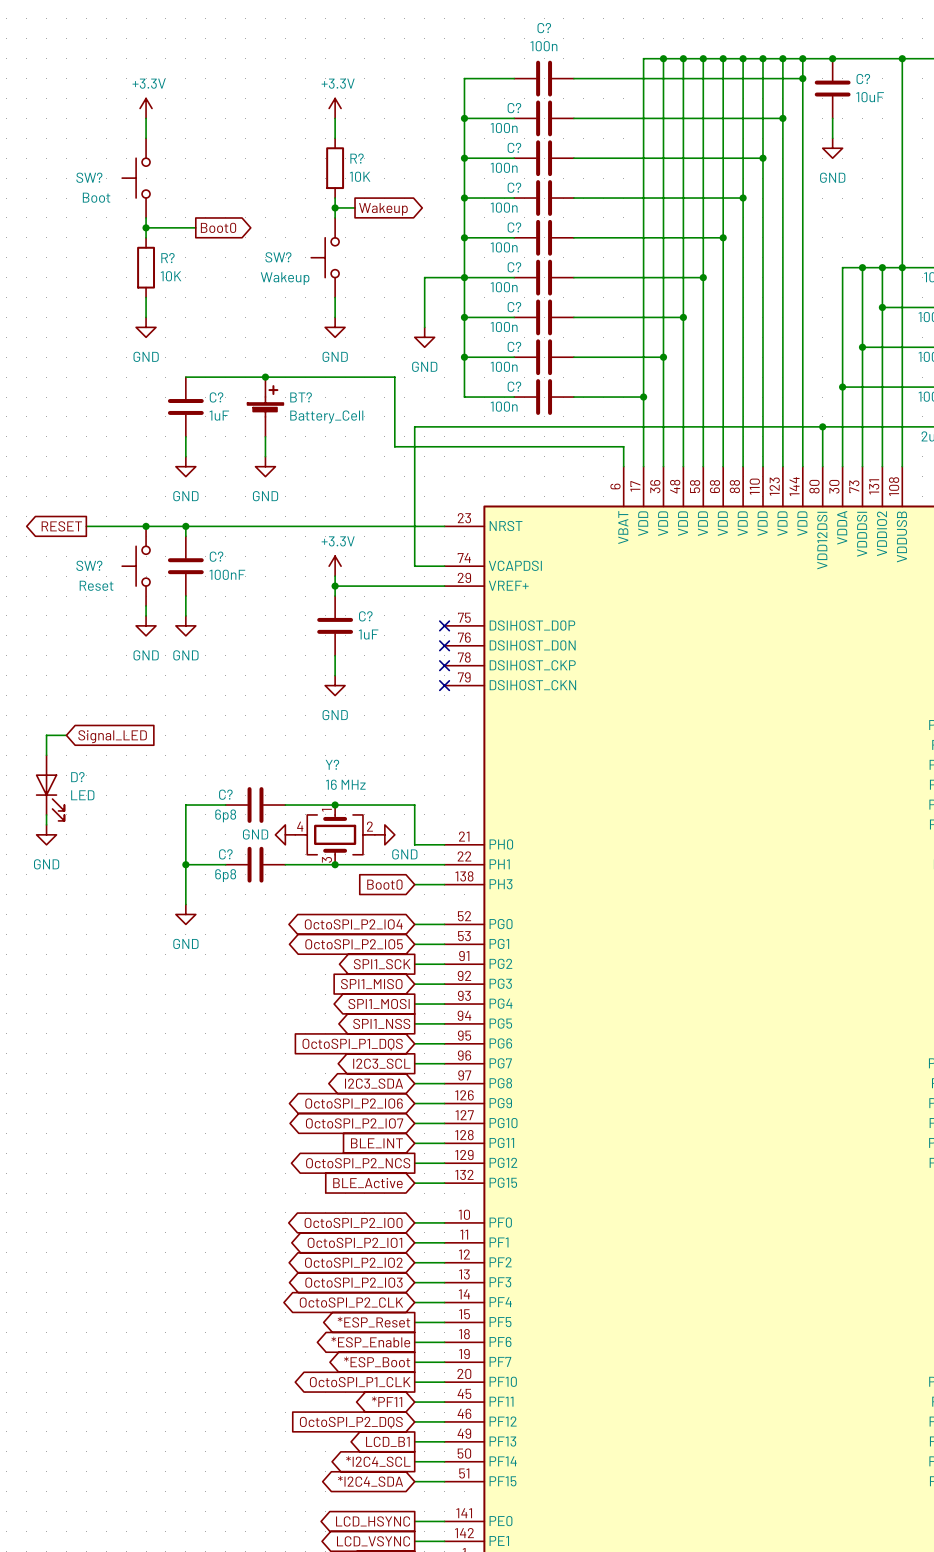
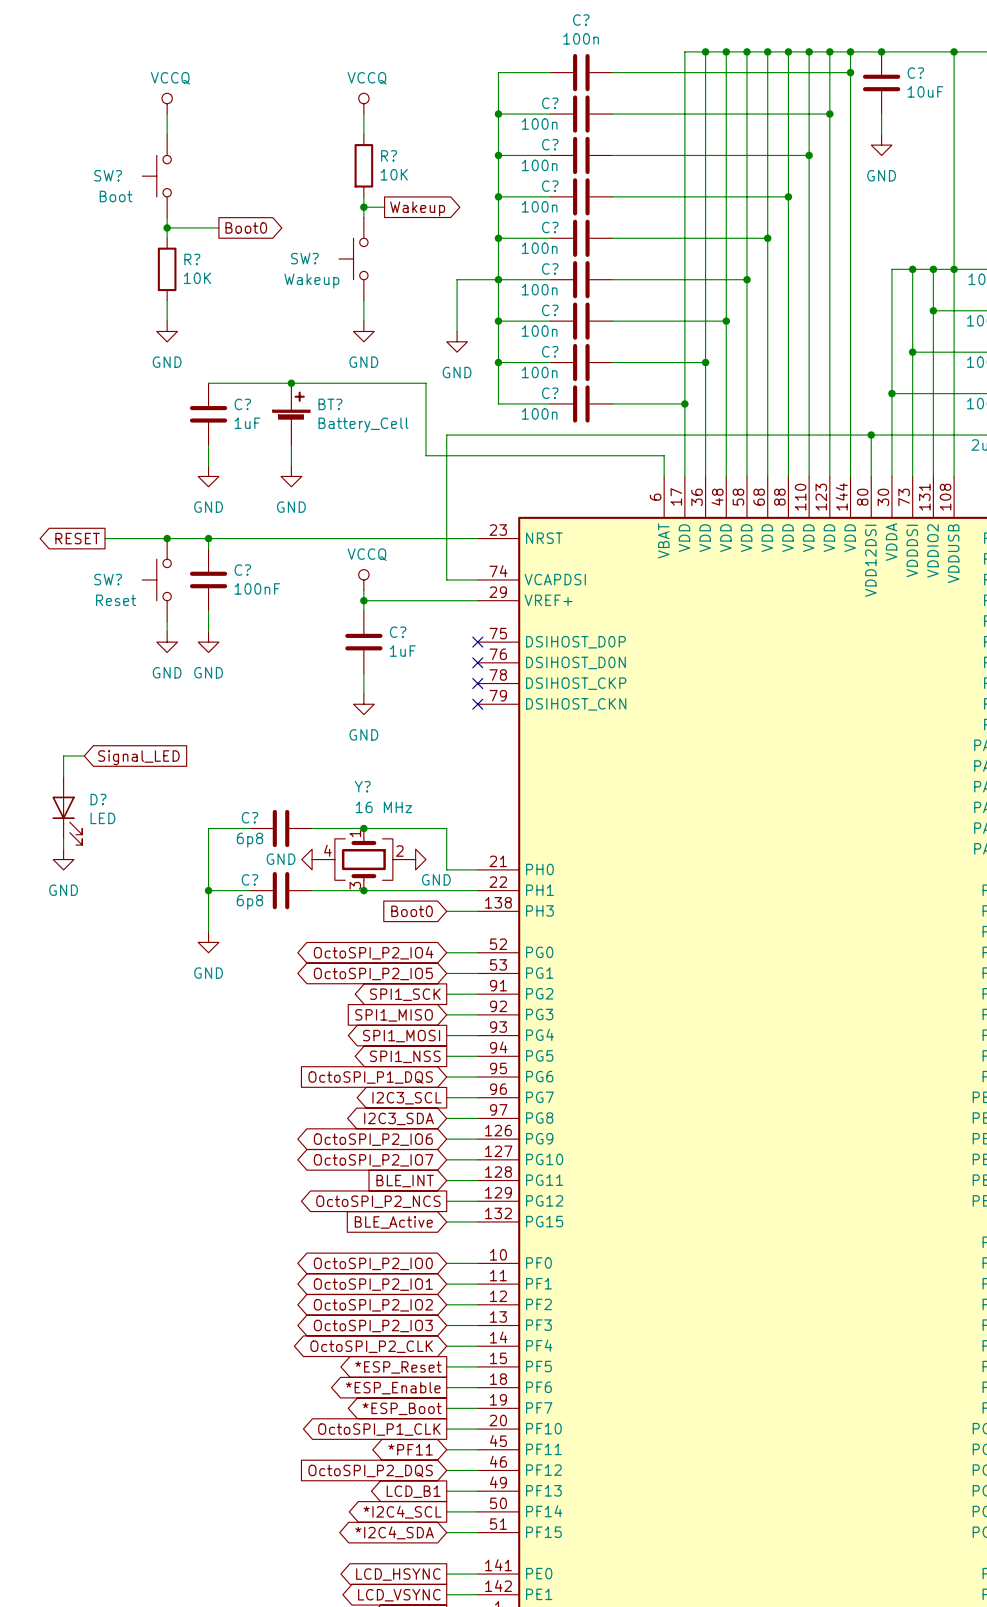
power symbol: +3.3V (146, 108) -> VCCQ (167, 103)
power symbol: +3.3V (335, 108) -> VCCQ (363, 103)
power symbol: +3.3V (335, 566) -> VCCQ (363, 579)

